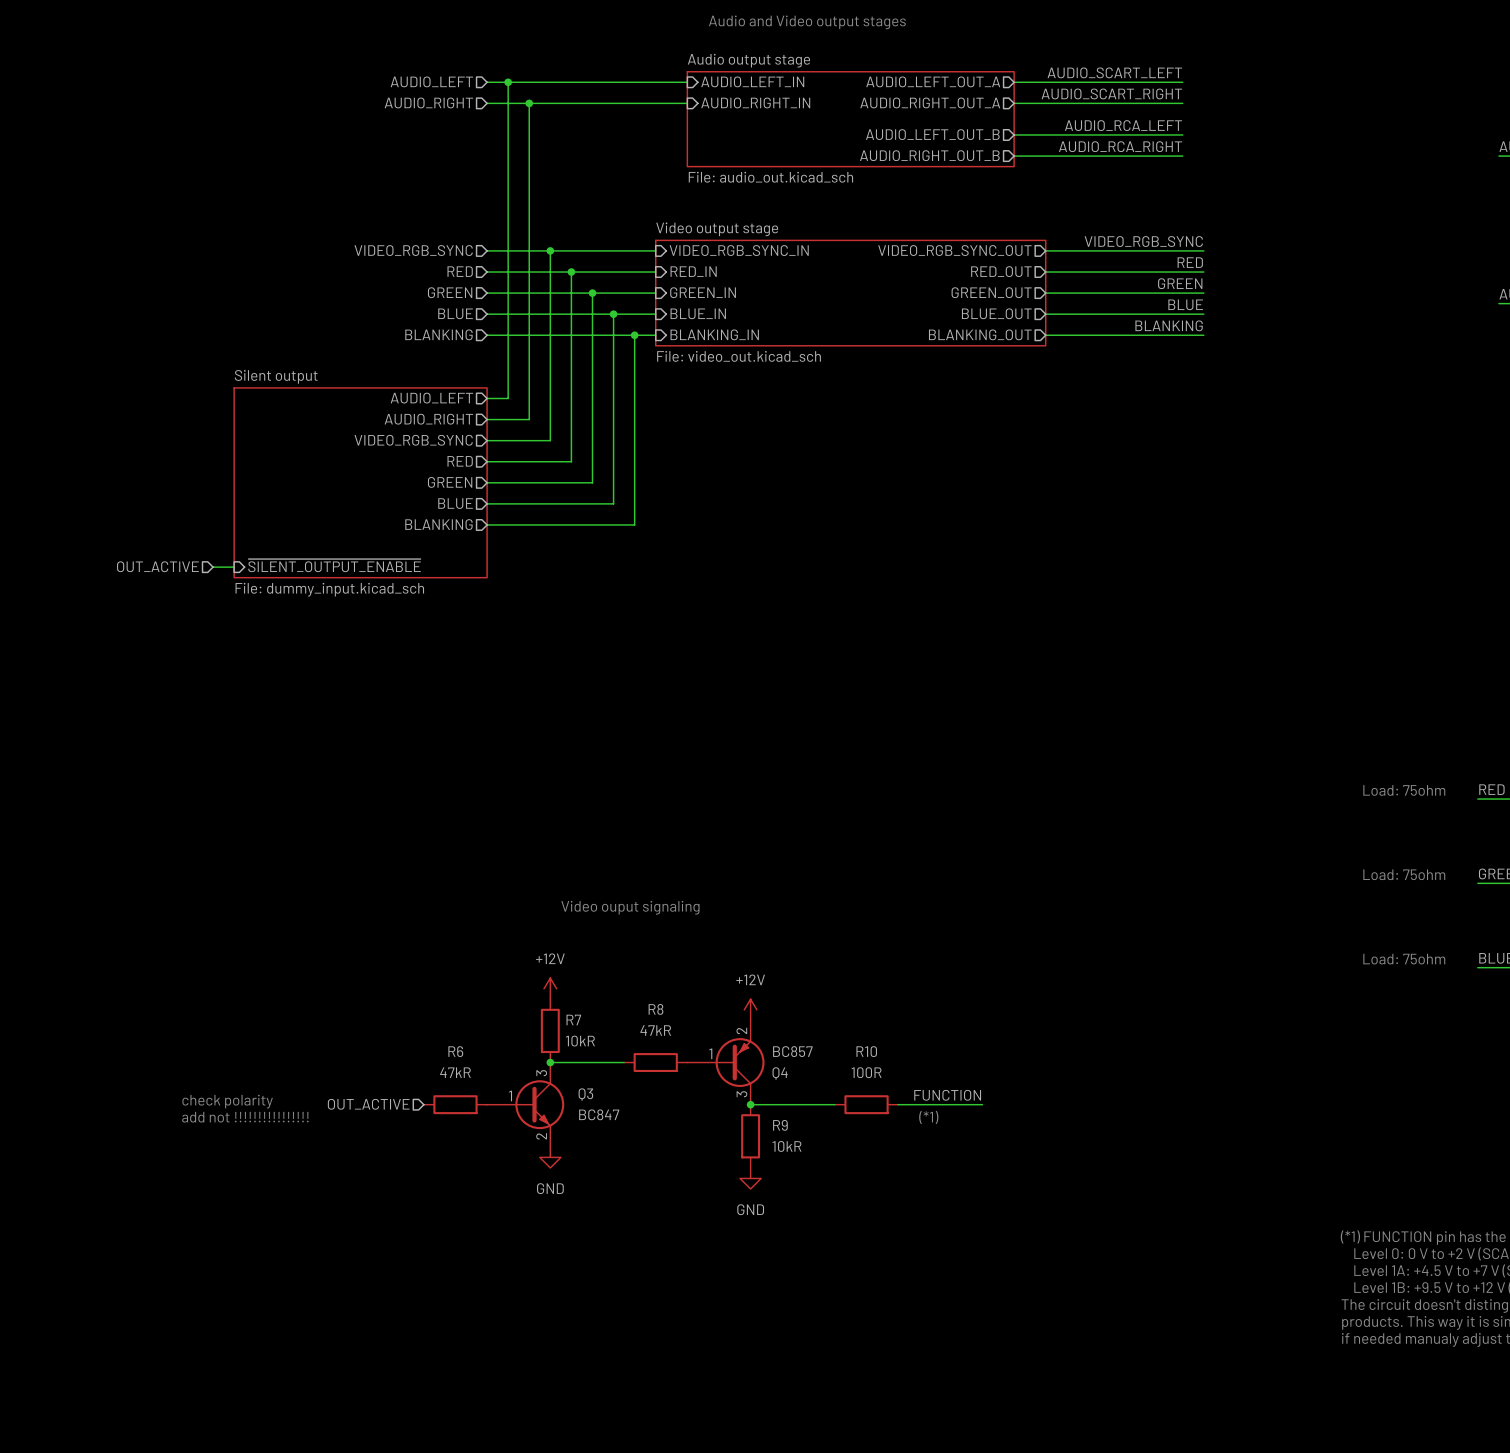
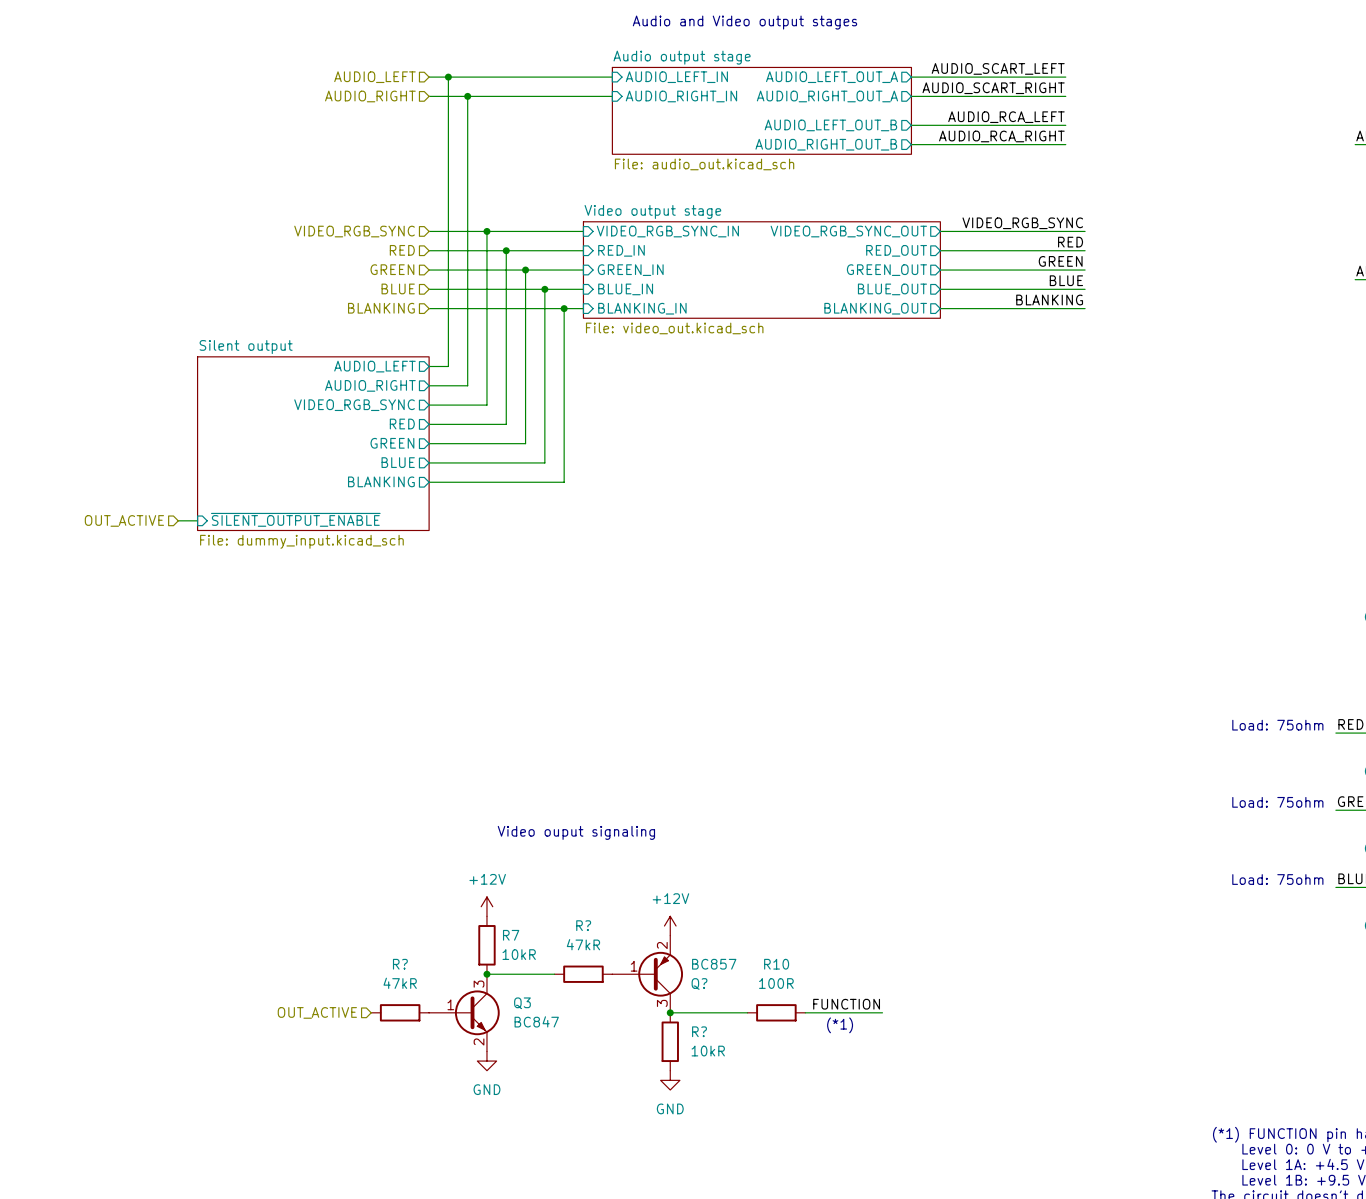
R8 name: R8 (655, 1009) -> R? (583, 925)
R6 name: R6 (455, 1051) -> R? (400, 964)
Q4 name: Q4 (780, 1073) -> Q? (699, 983)
text: check polarity (227, 1101) -> none
text: add not !!!!!!!!!!!!!!!! (245, 1117) -> none
R9 name: R9 (780, 1125) -> R? (699, 1031)

